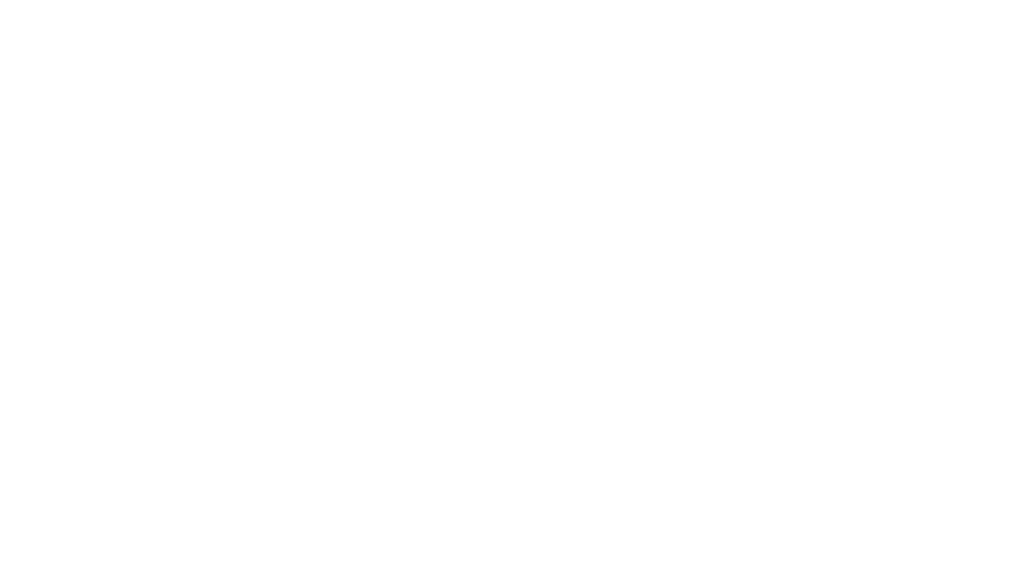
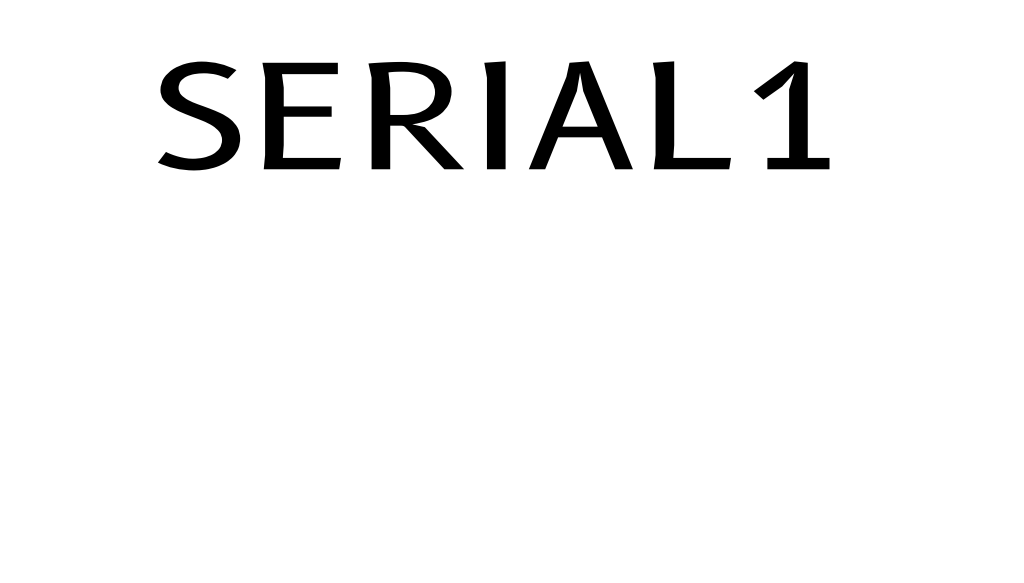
SERIAL1 name: none -> SERIAL1 (493, 115)

